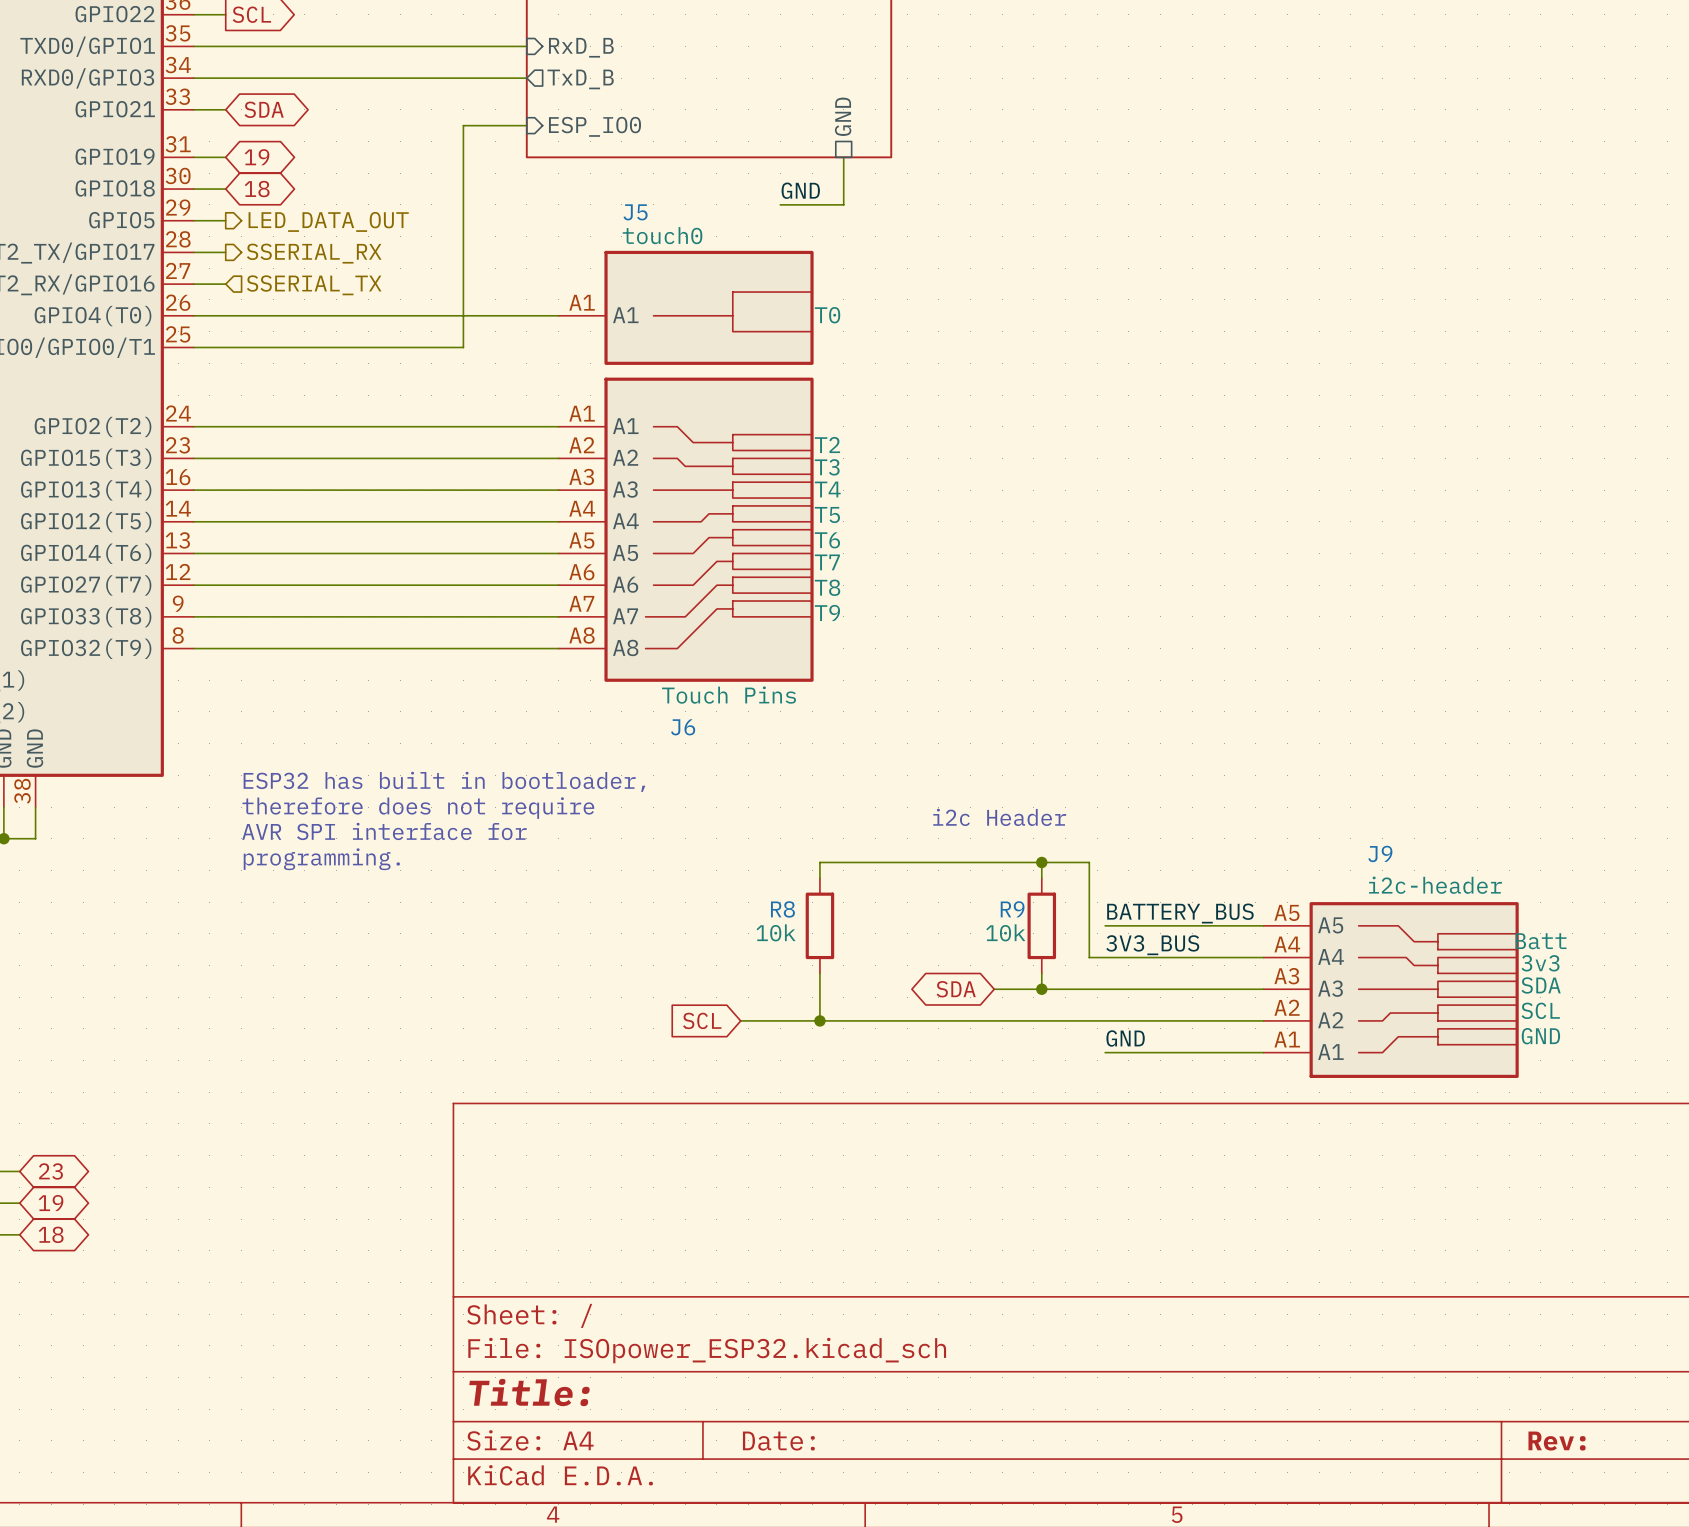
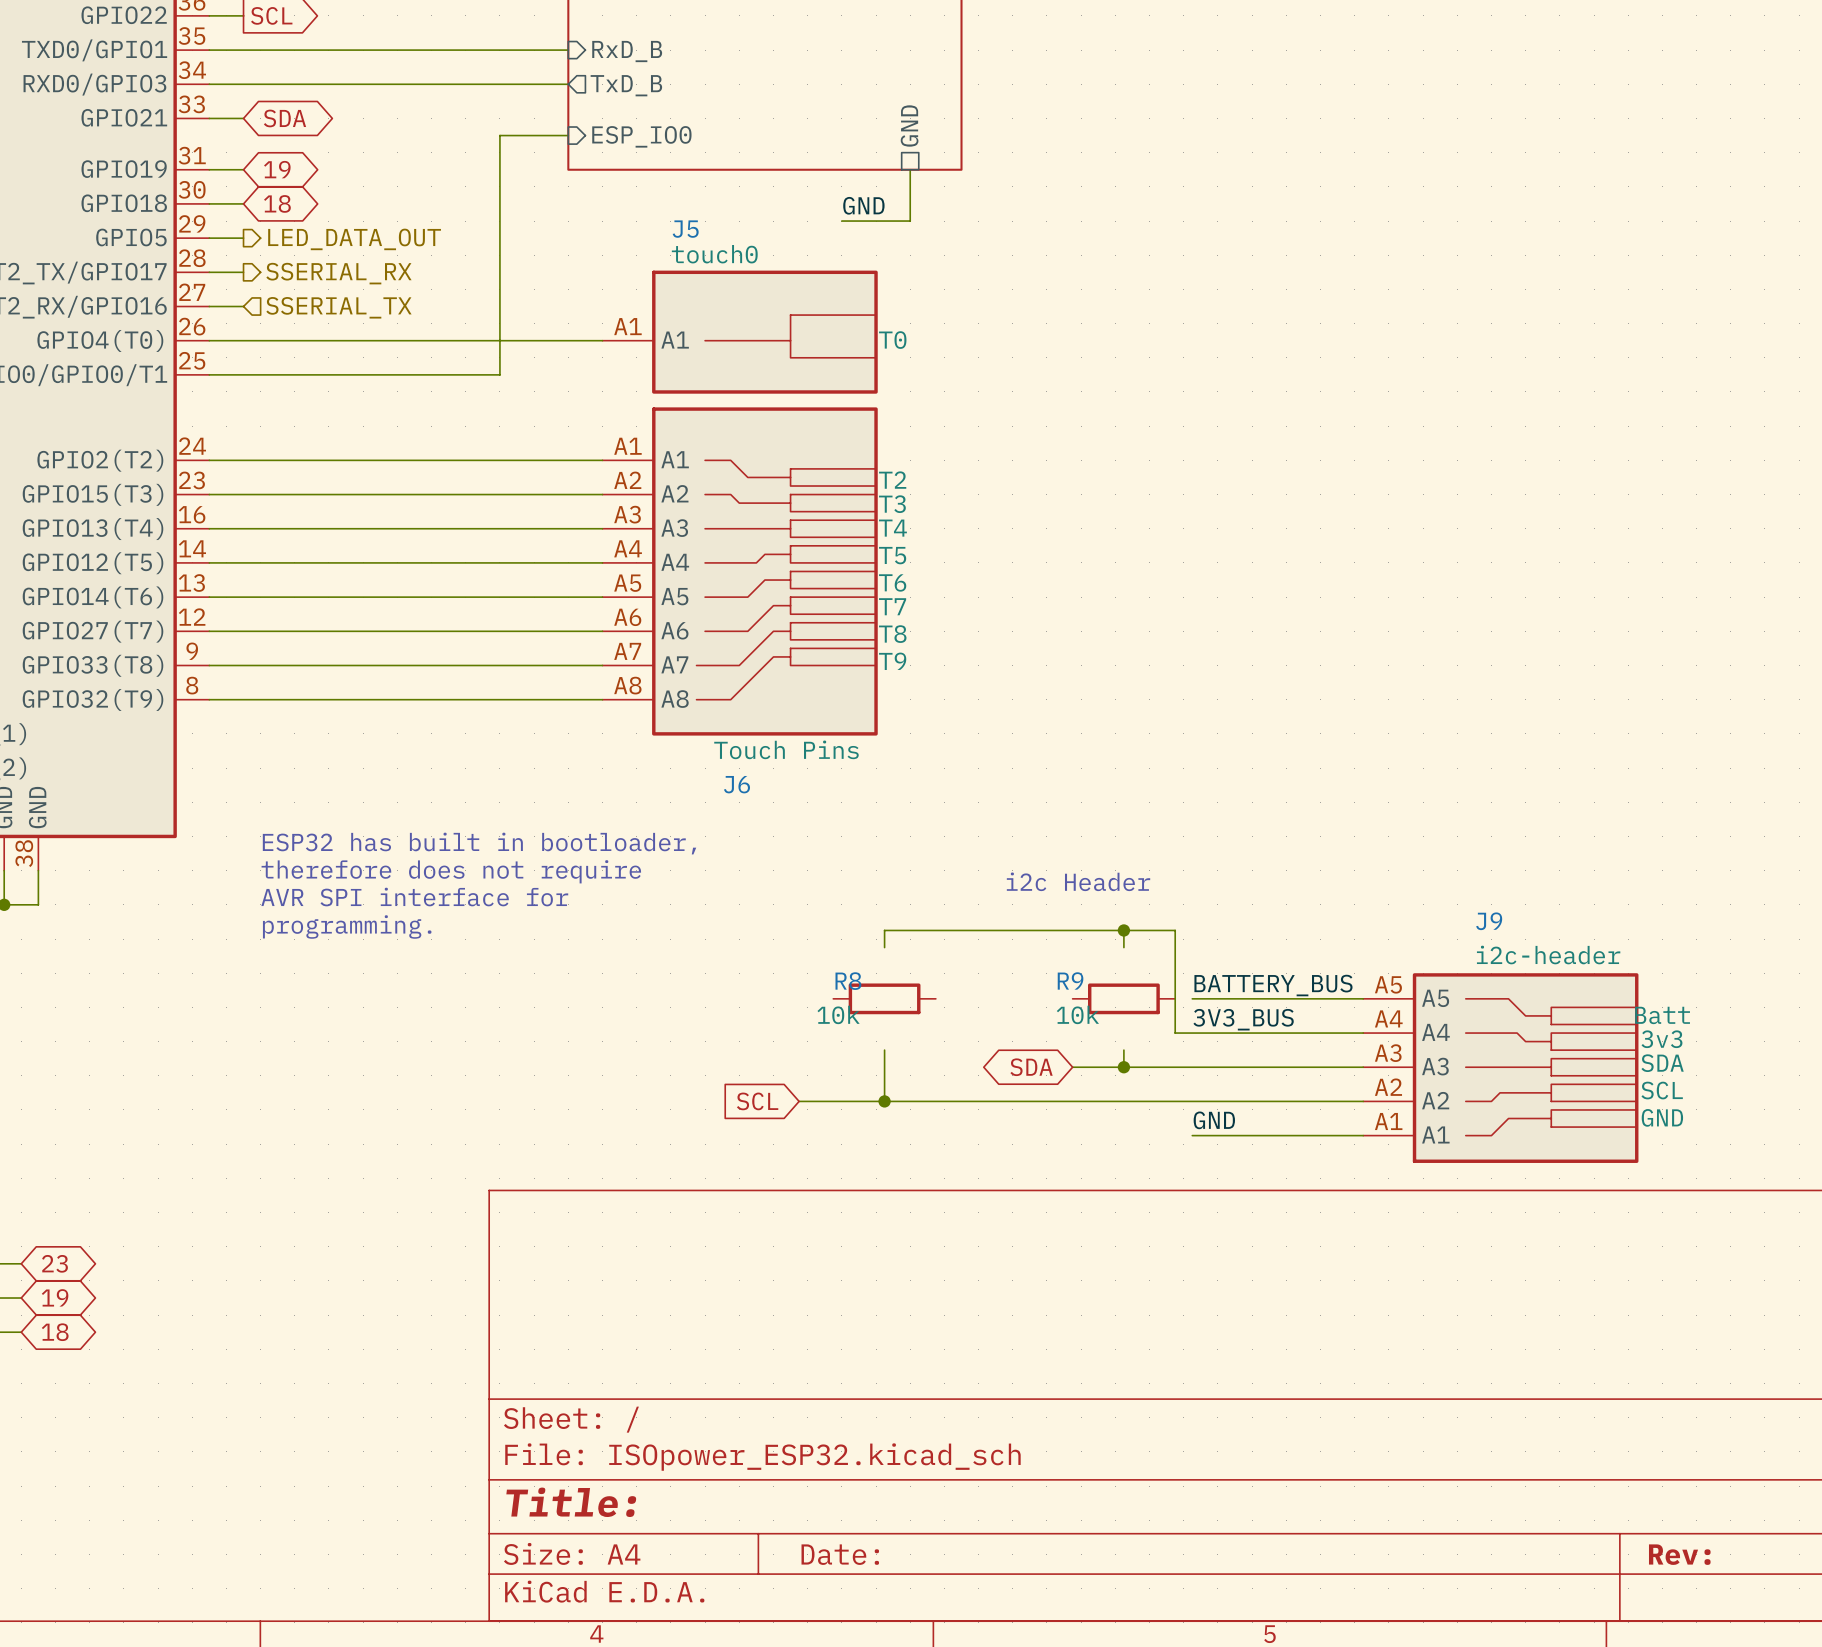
R8 rotation: 0° (819, 925) -> 90° clockwise (884, 998)
R9 rotation: 0° (1041, 925) -> 90° clockwise (1123, 998)

